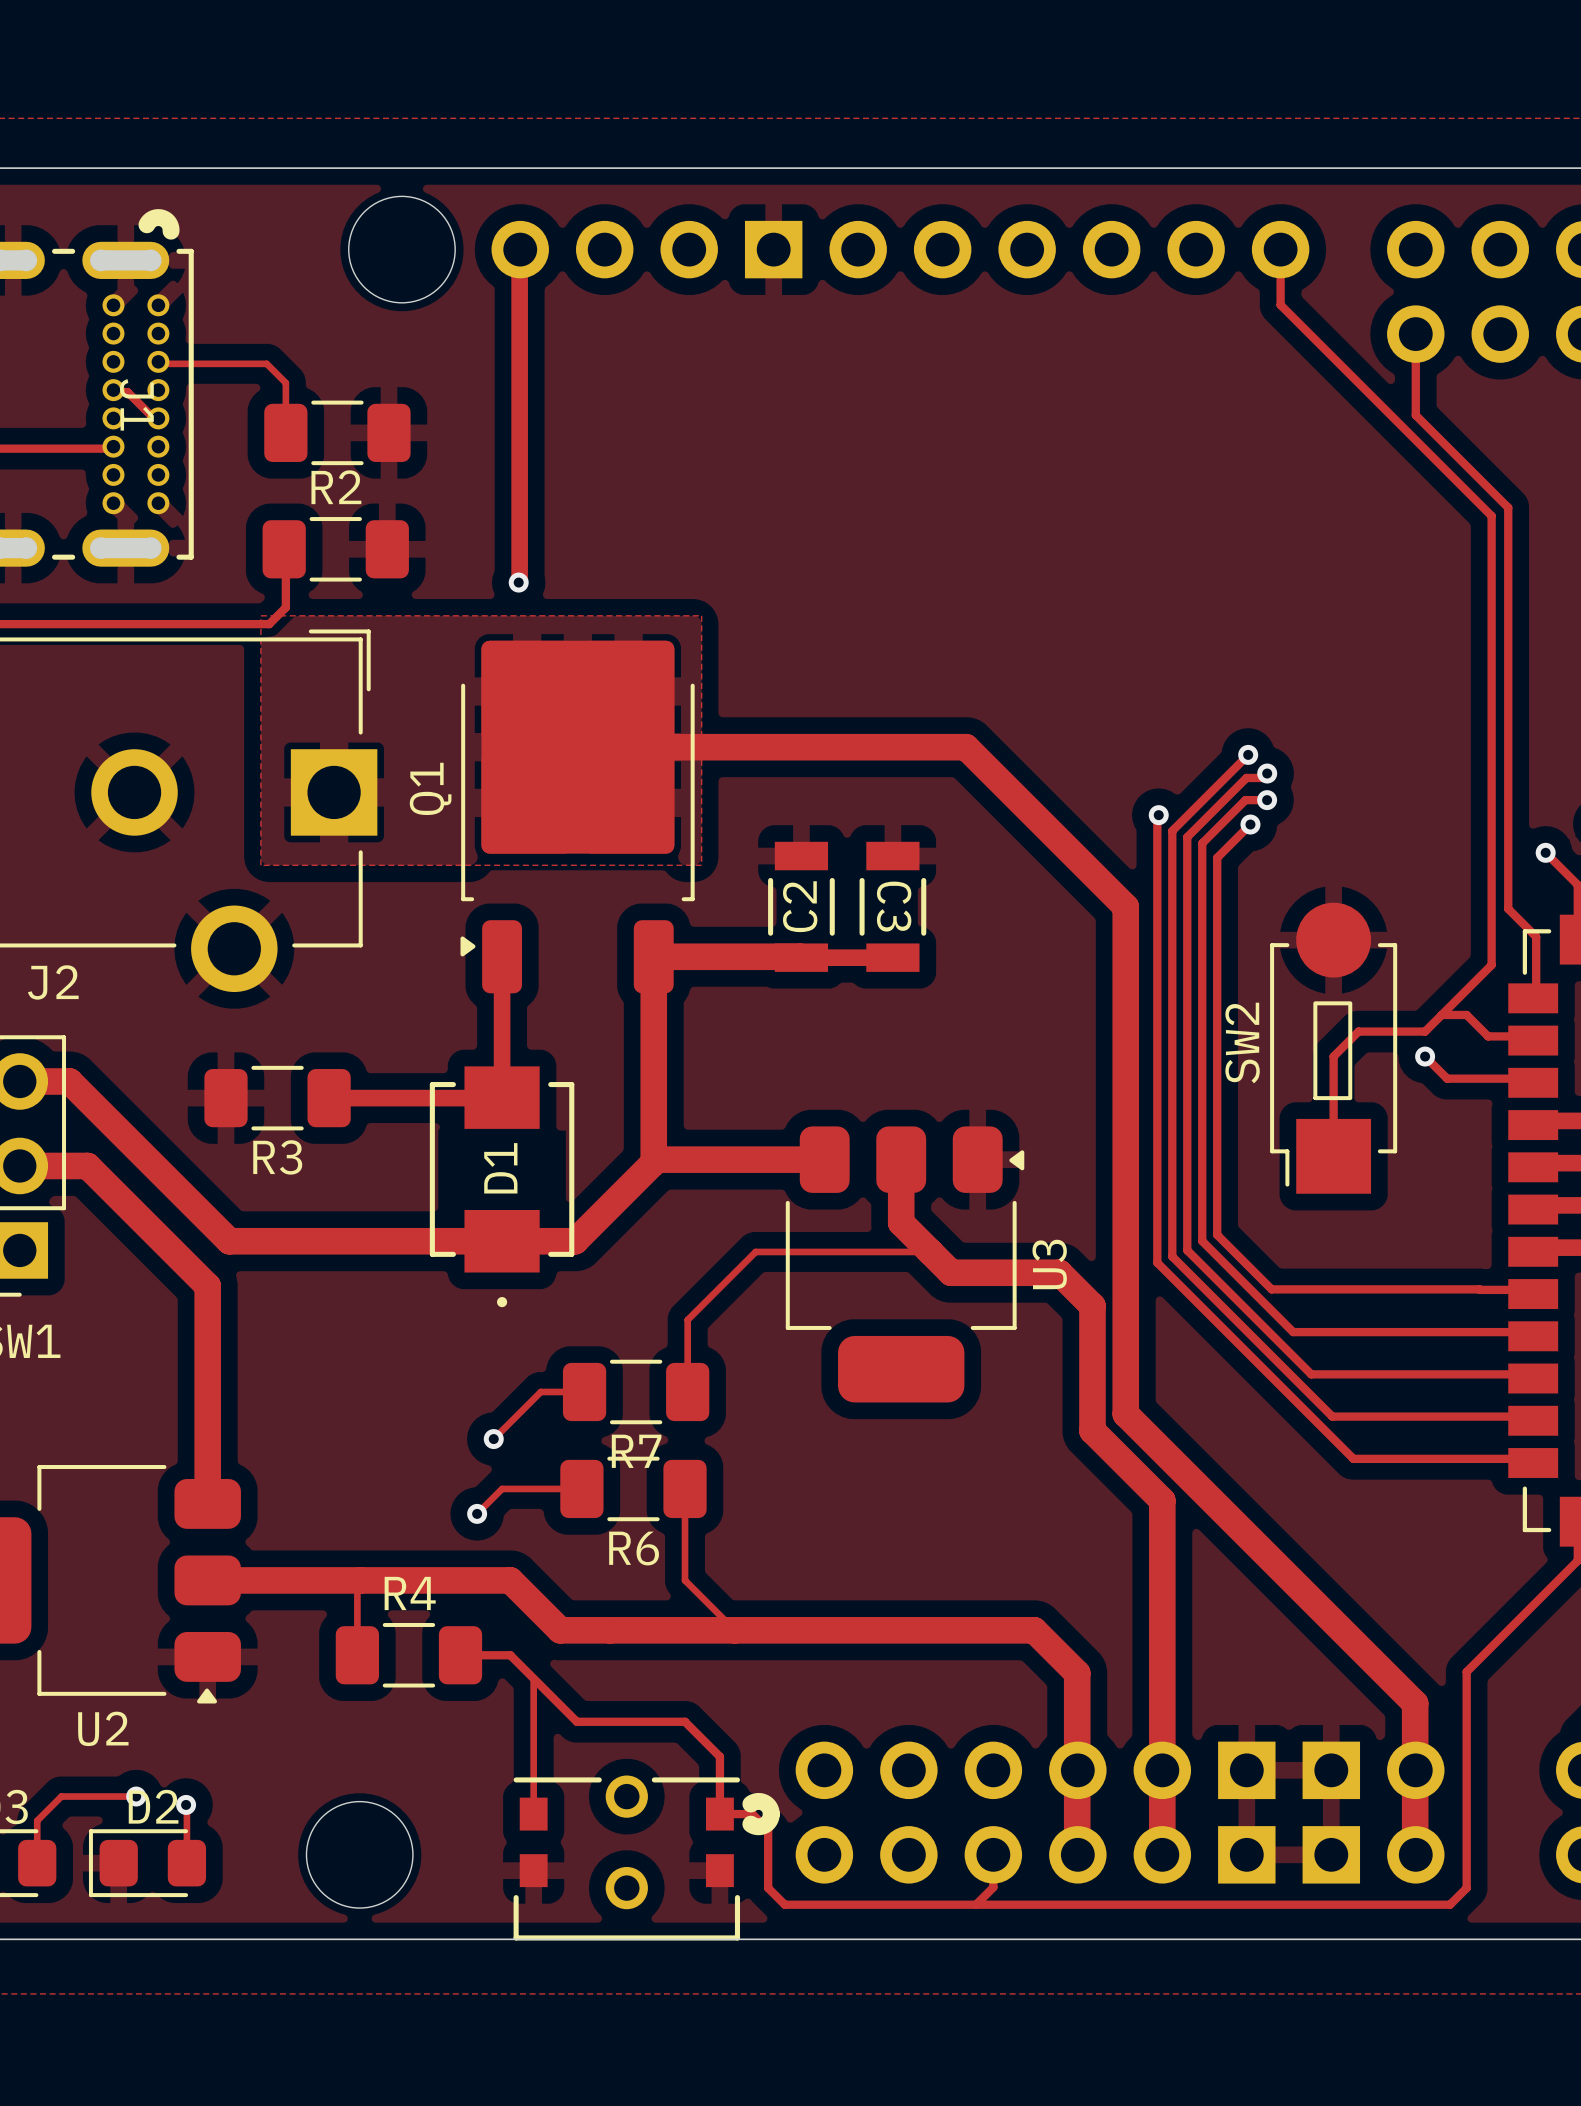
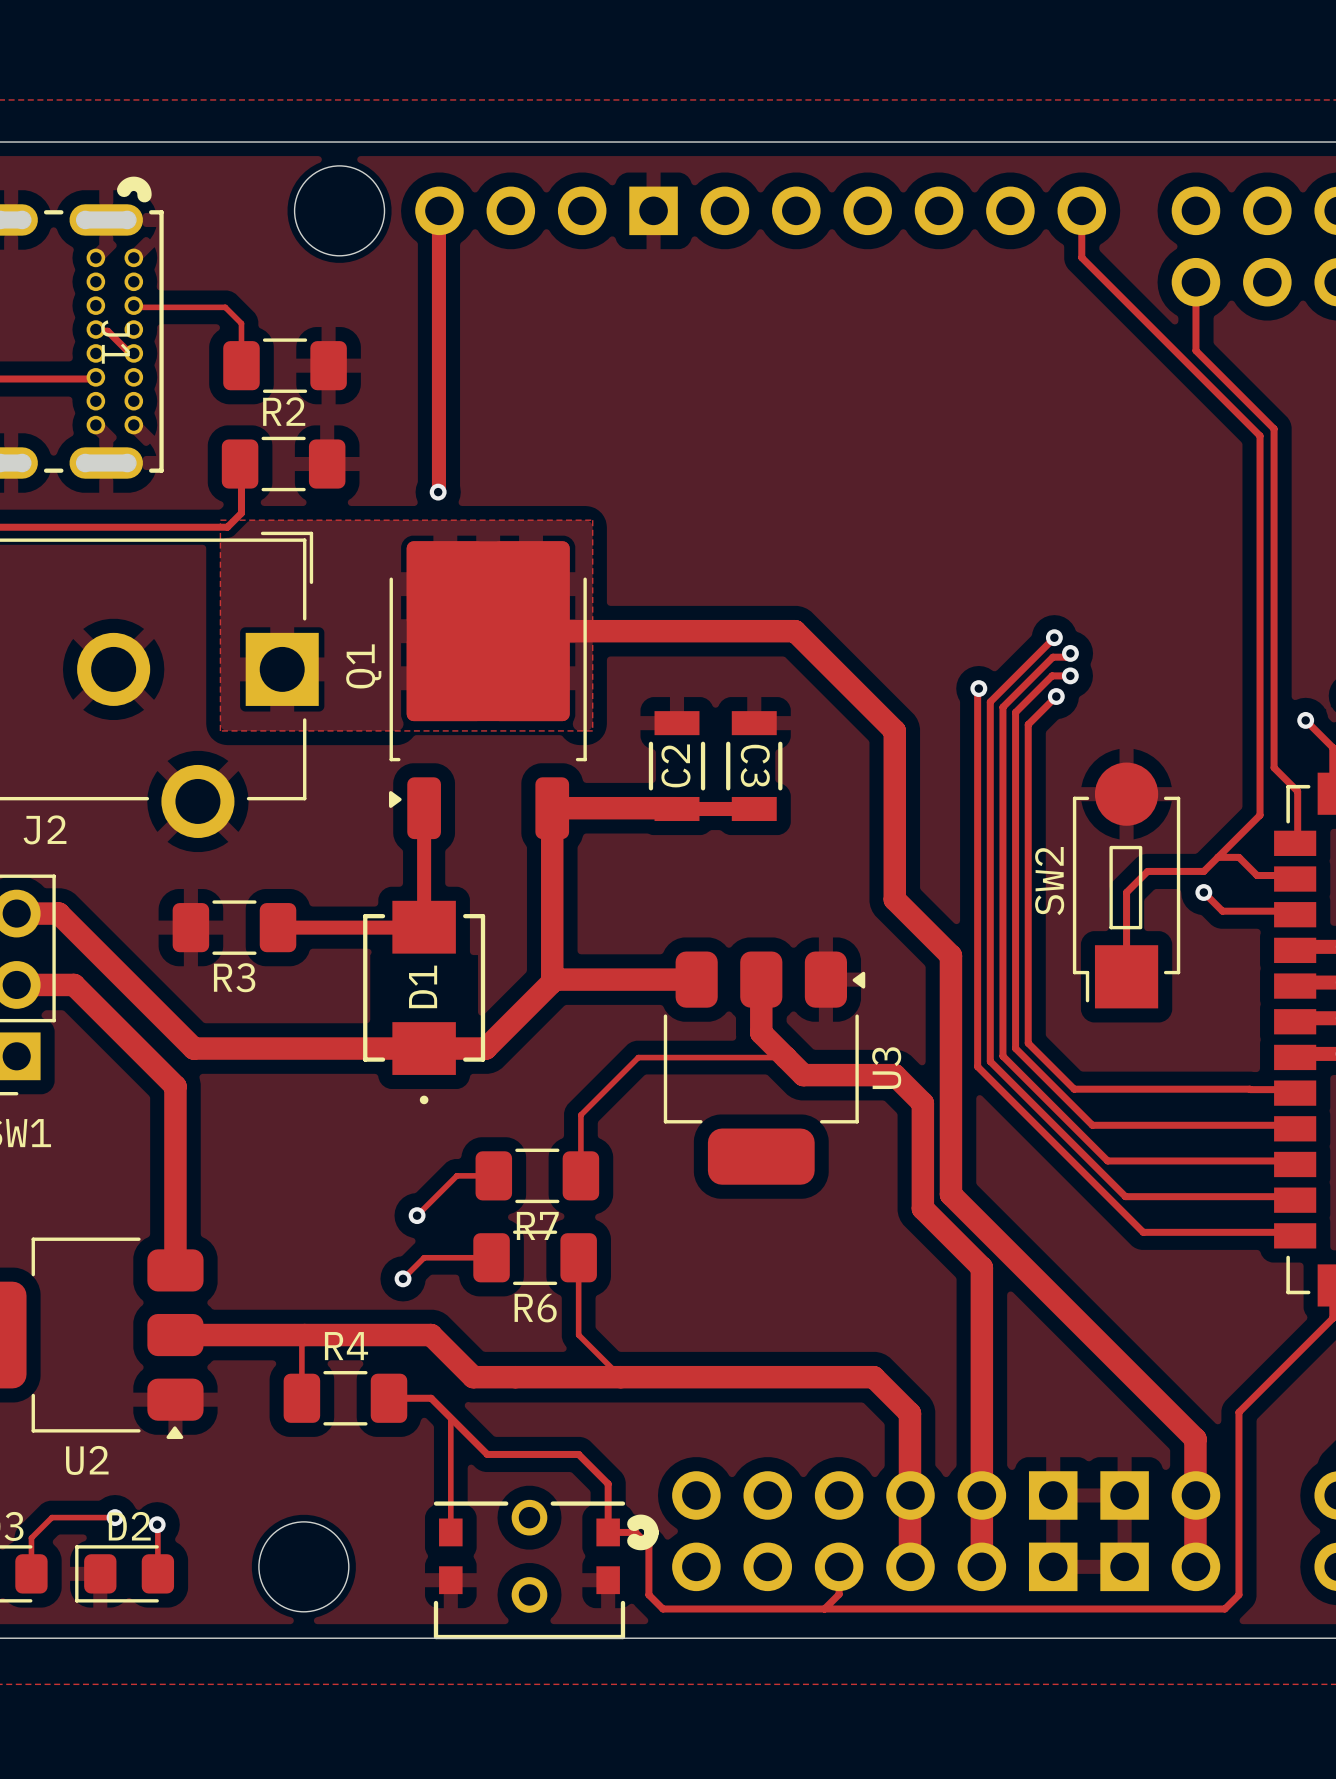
track: (941, 747) (966, 747) (1125, 906) (1125, 1131) -> (795, 631) (894, 730) (894, 899) (950, 955)

